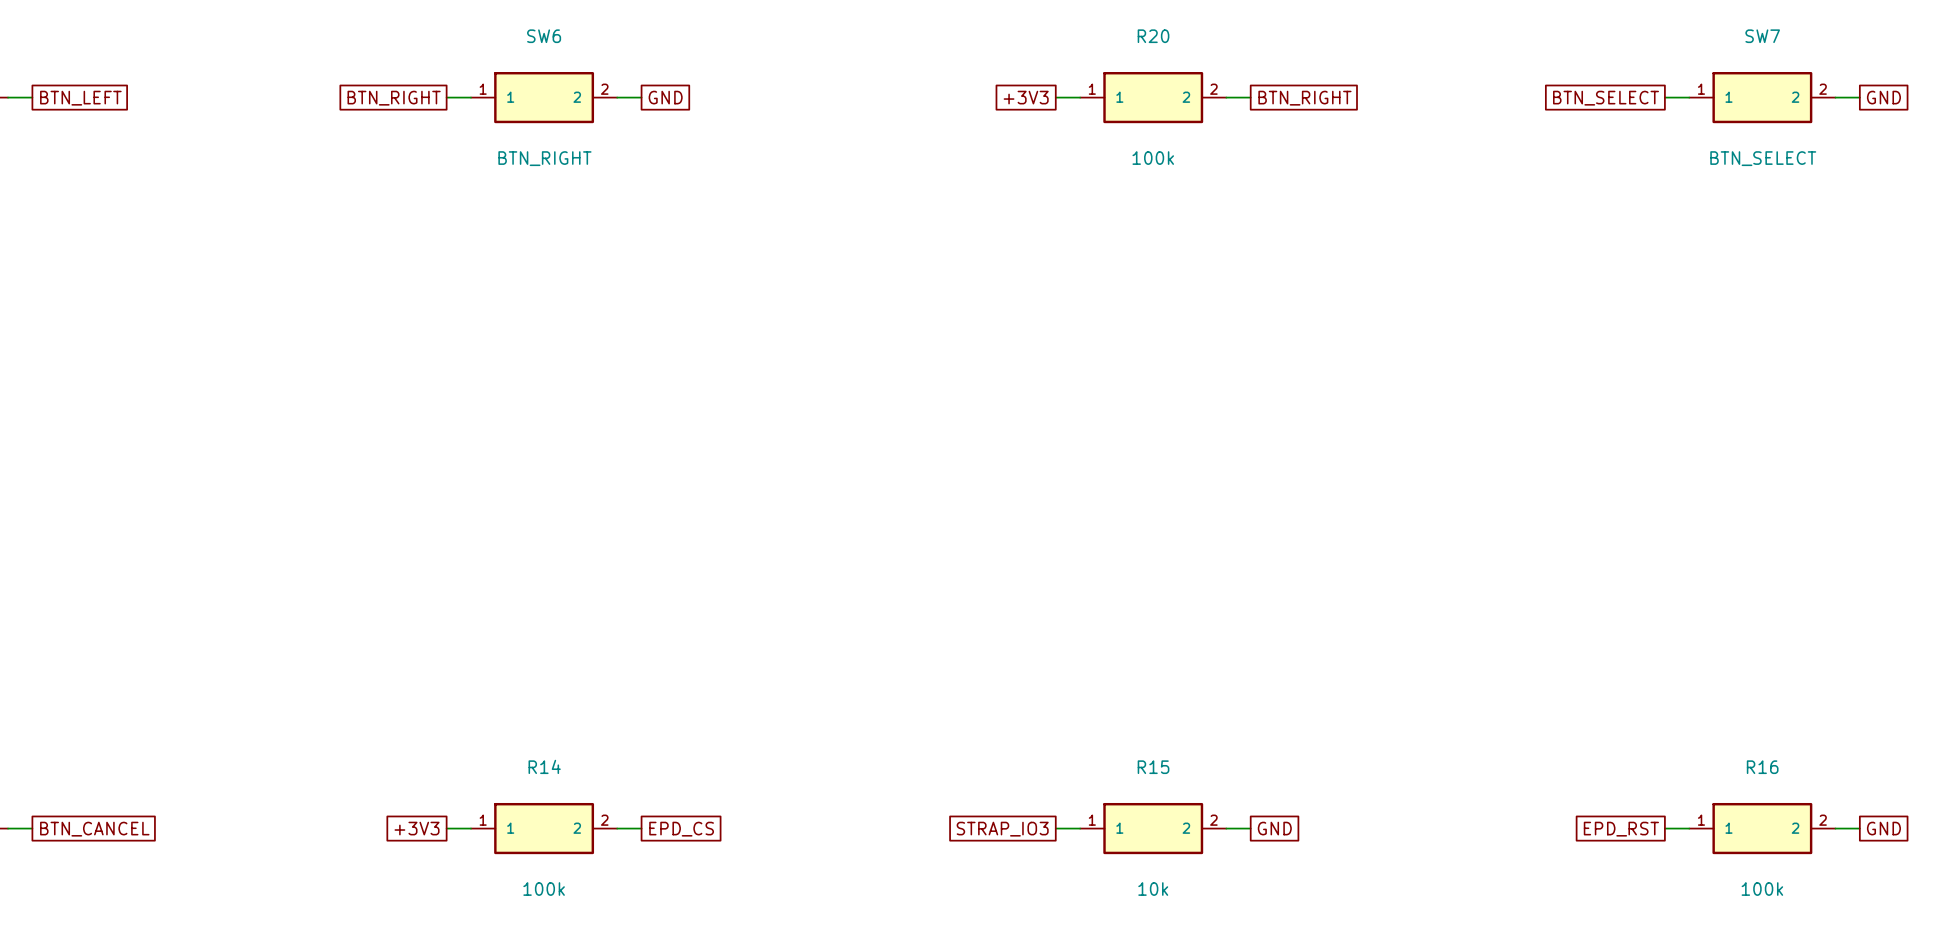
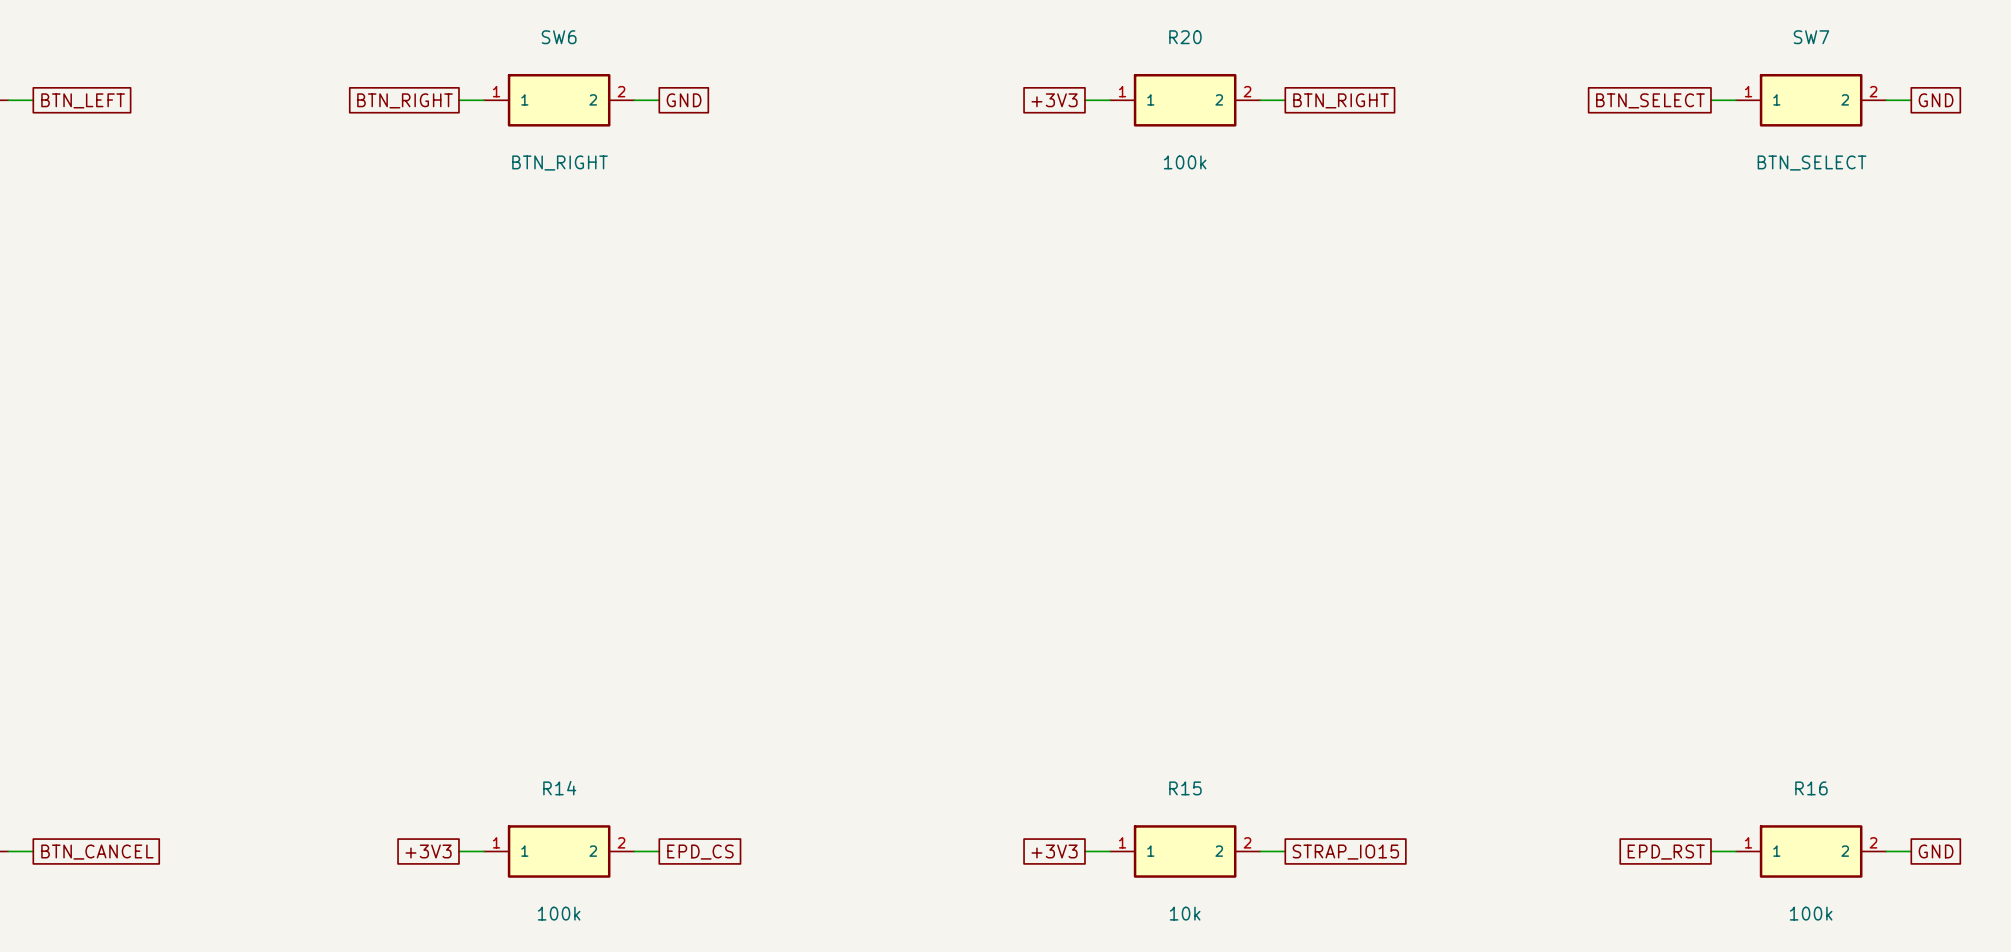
global label: GND (1274, 828) -> STRAP_IO15 (1345, 852)
global label: STRAP_IO3 (1002, 829) -> +3V3 (1054, 851)

